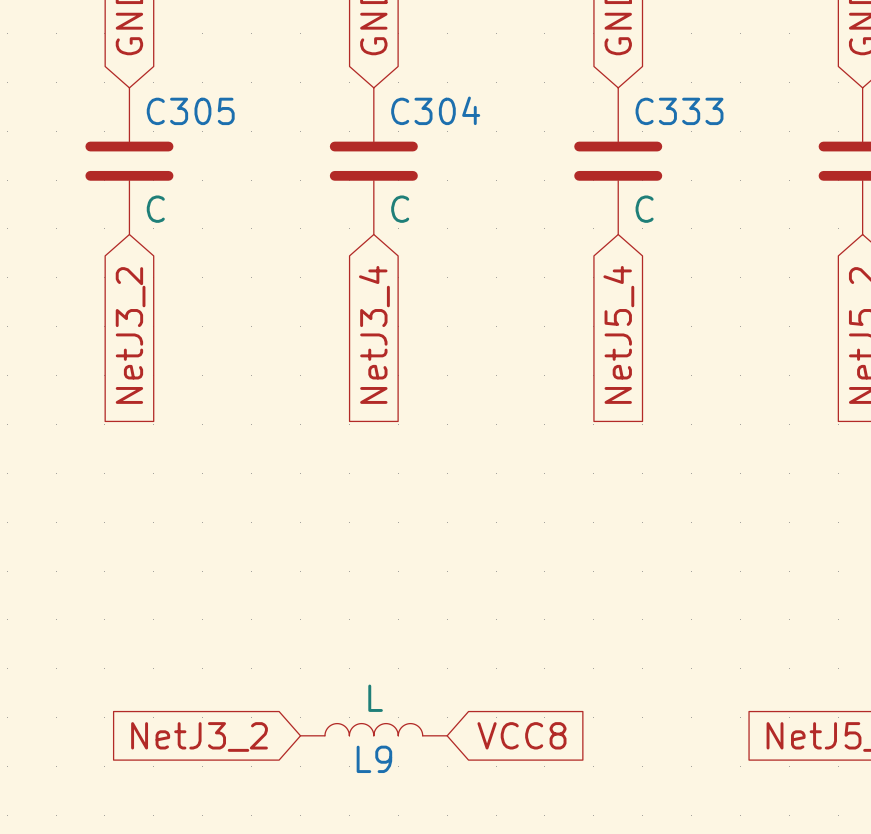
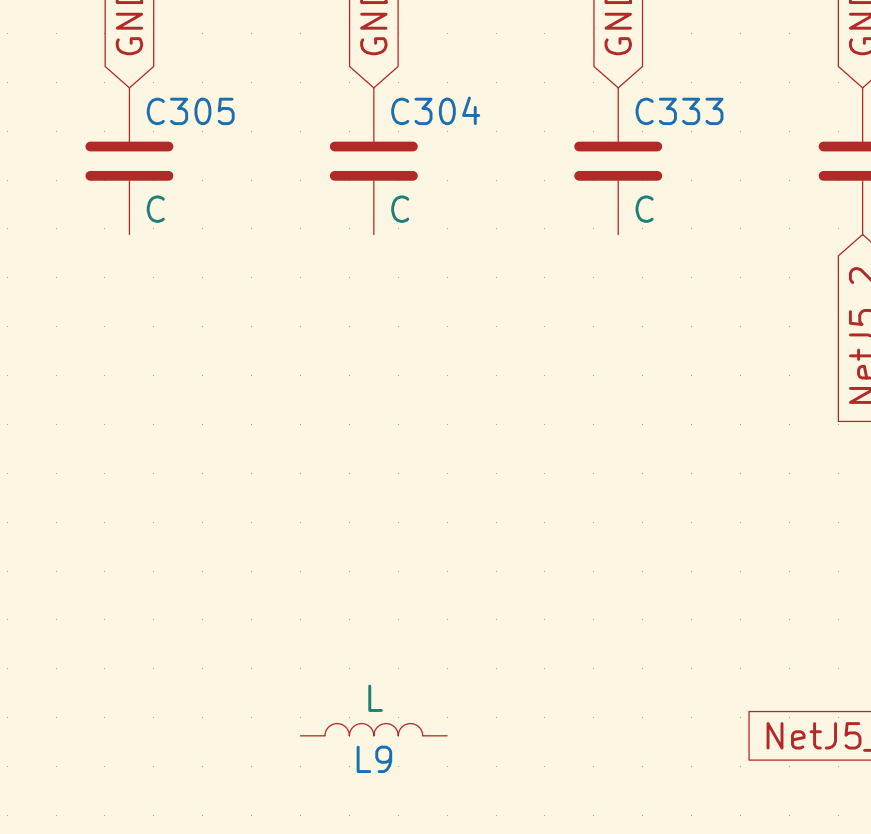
global label: NetJ3_4 (374, 334) -> none
global label: NetJ5_4 (618, 334) -> none
global label: NetJ3_2 (130, 335) -> none
global label: VCC8 (521, 735) -> none
global label: NetJ3_2 (199, 736) -> none

